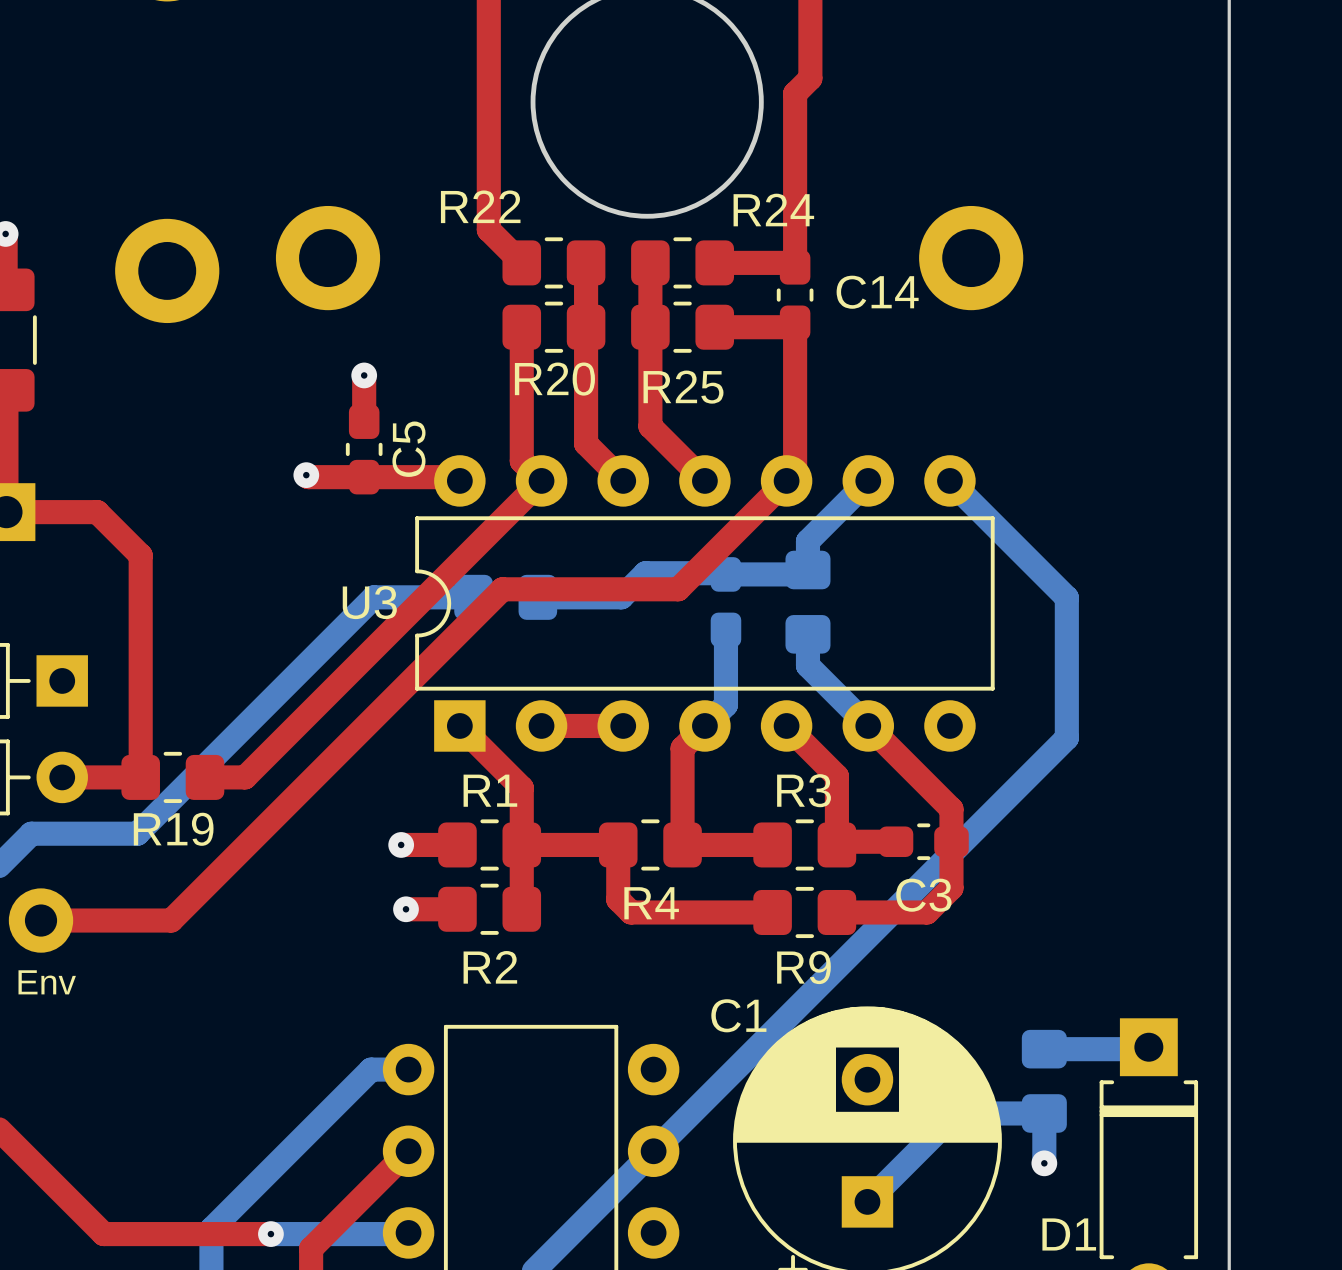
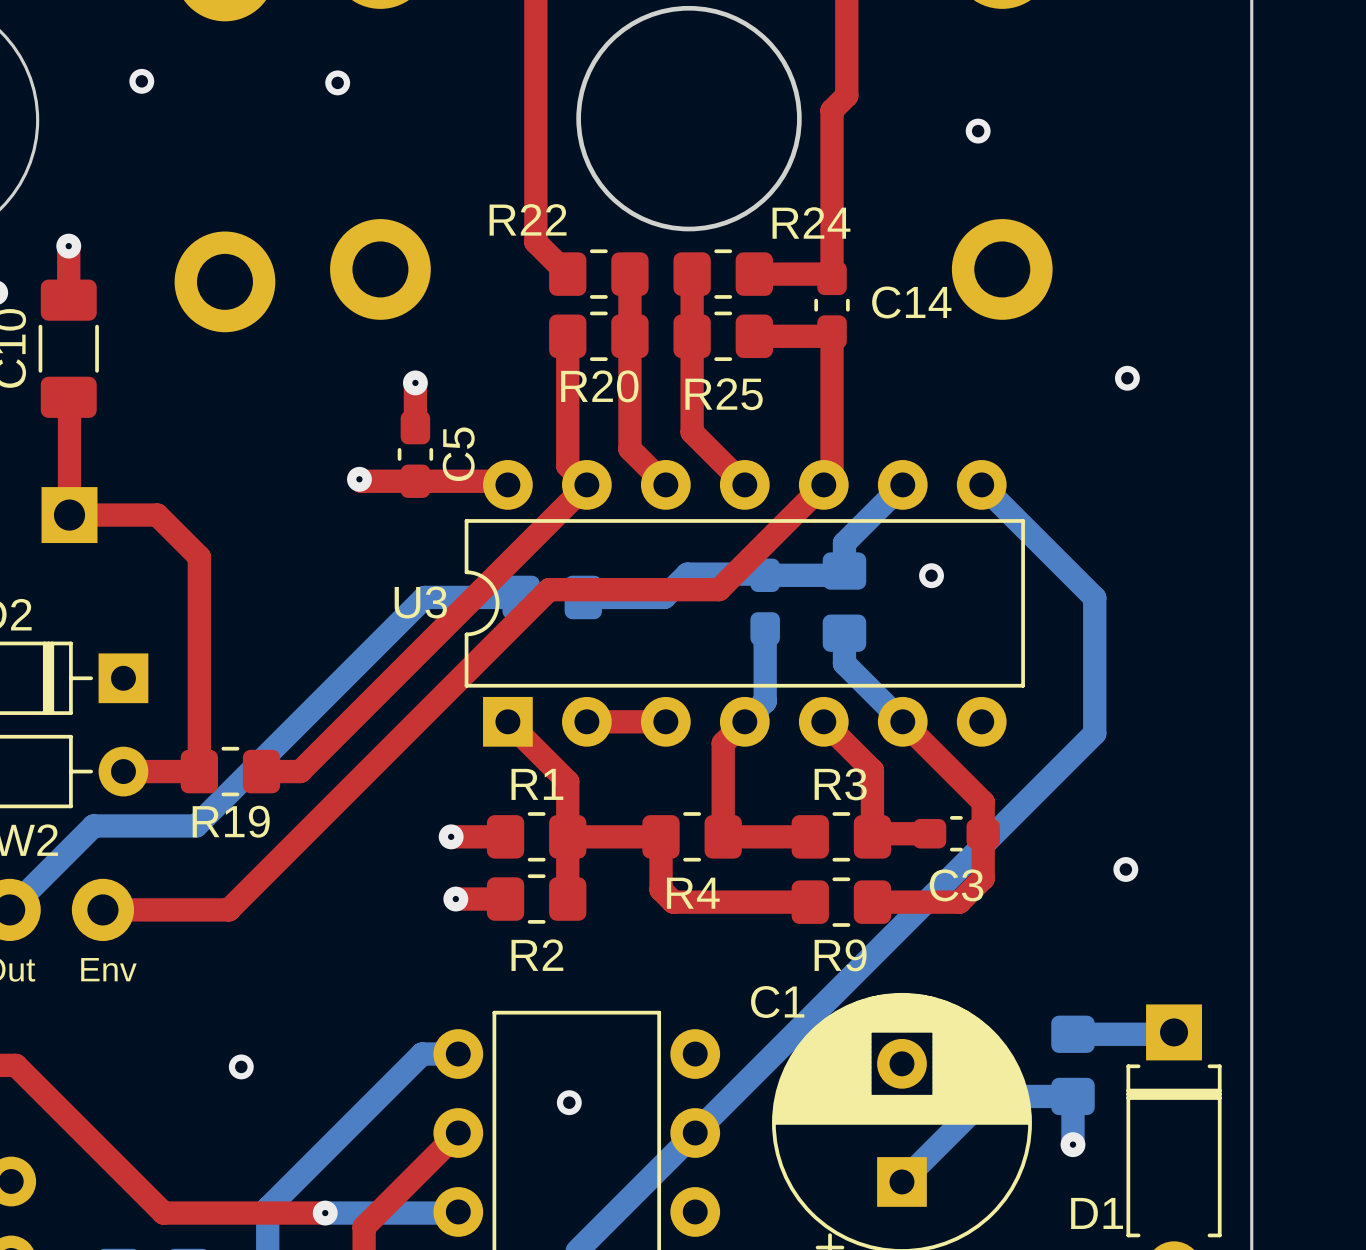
via: none -> (141, 81)
via: none -> (337, 82)
via: none -> (978, 131)
via: none -> (1127, 378)
via: none -> (931, 575)
via: none -> (1125, 869)
via: none -> (241, 1066)
via: none -> (569, 1102)

